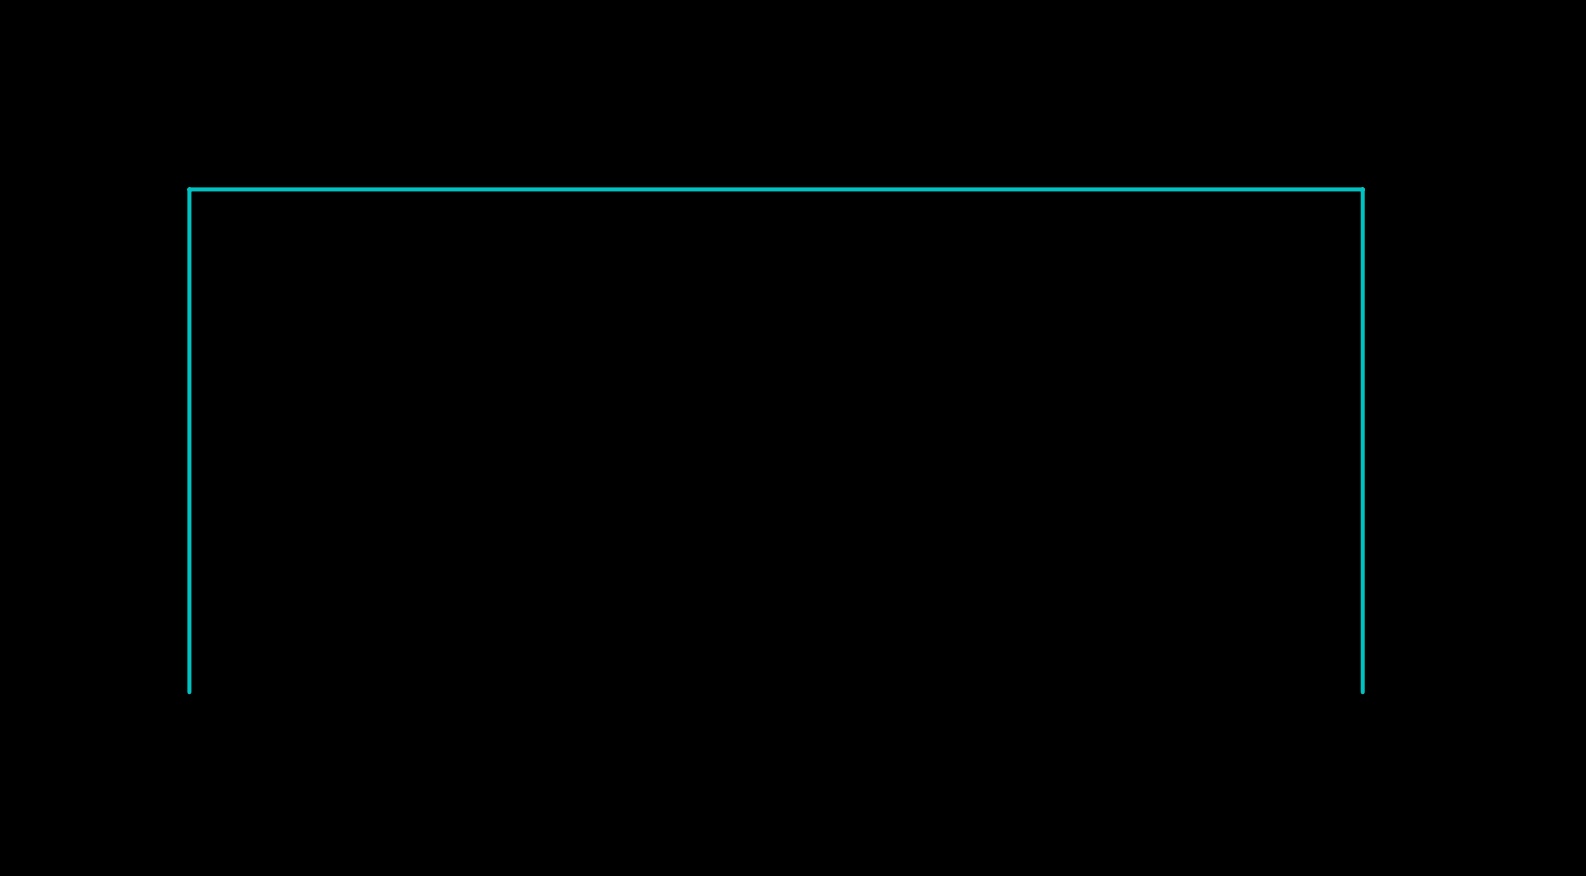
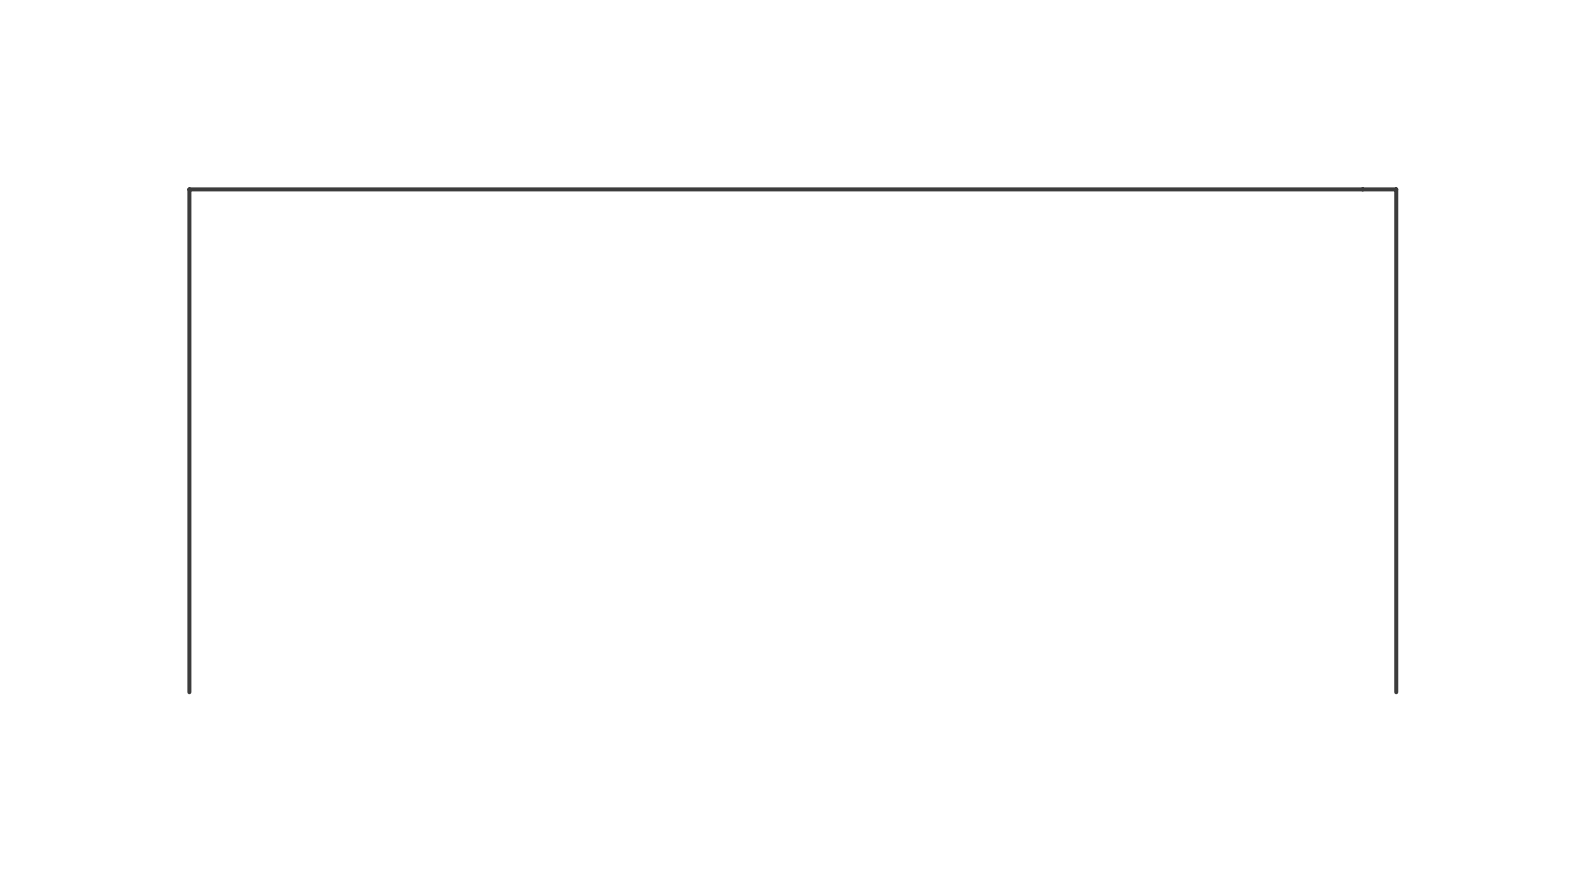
line: (1362, 189) (1362, 692) -> (1362, 189) (1396, 189) (1396, 692)

